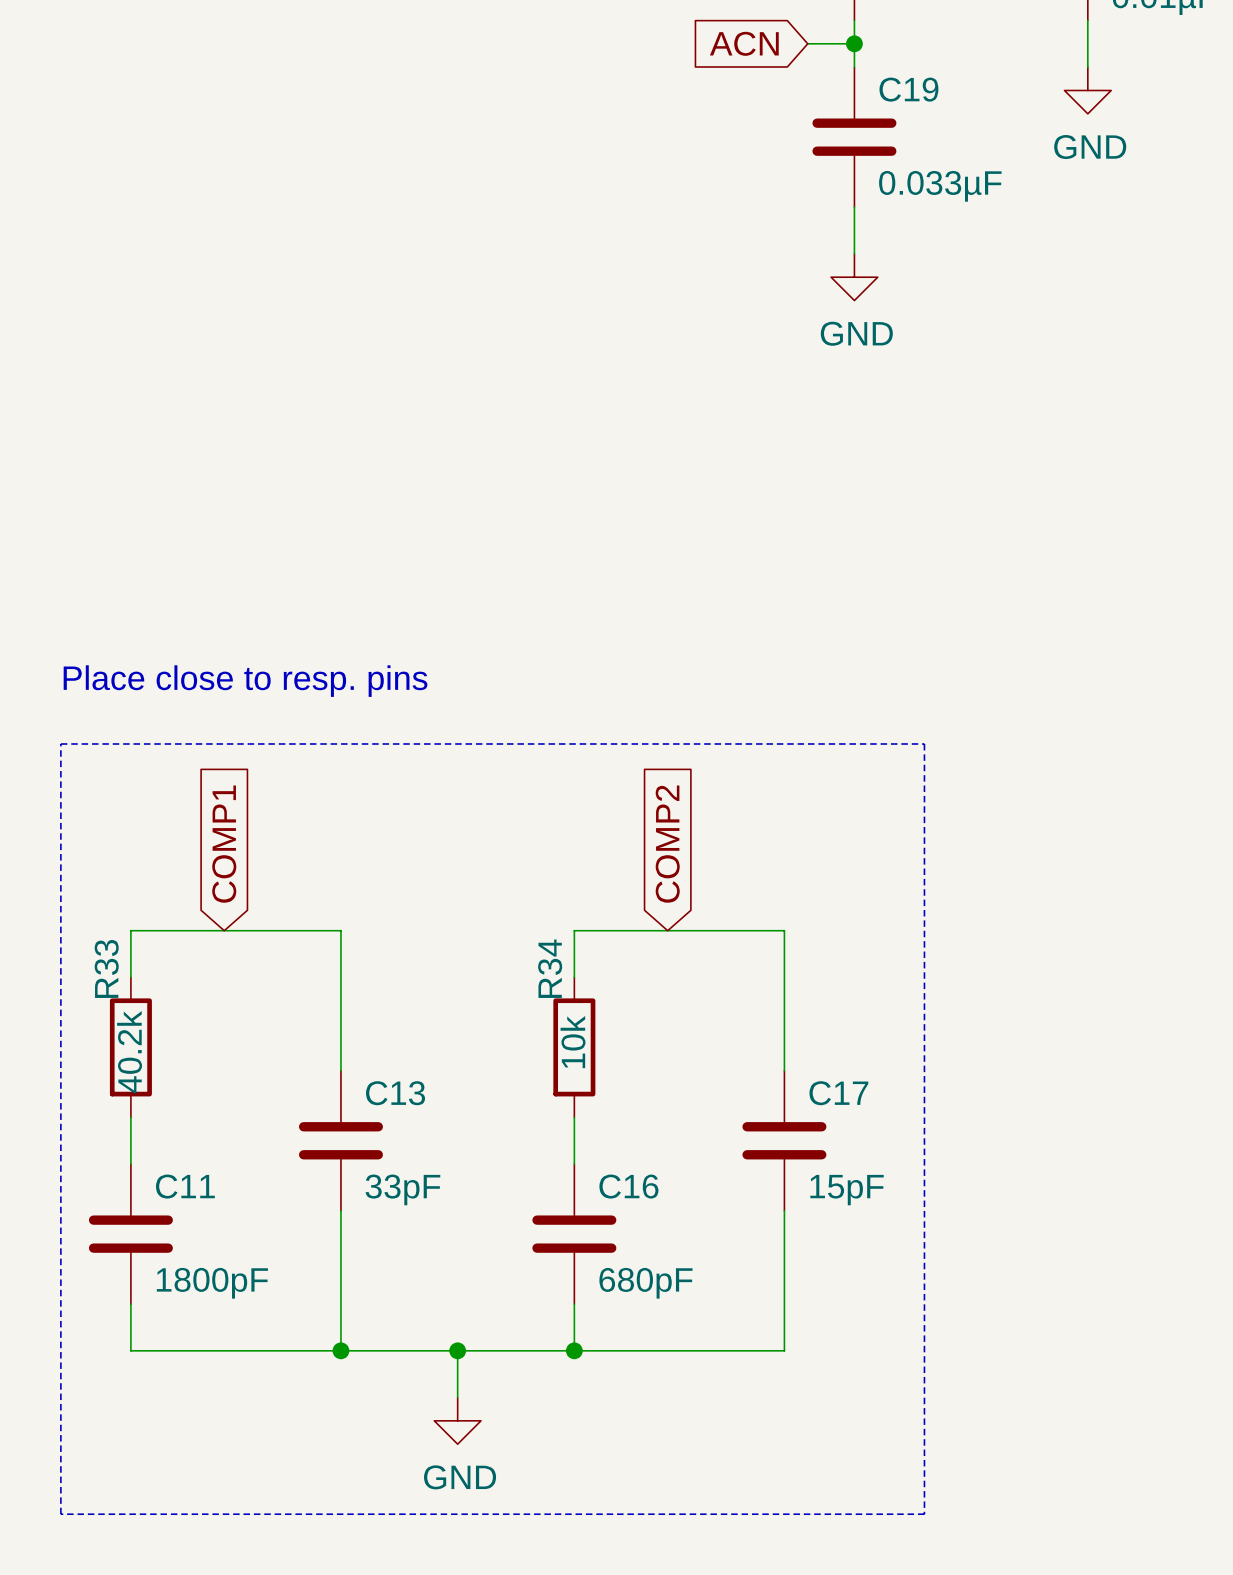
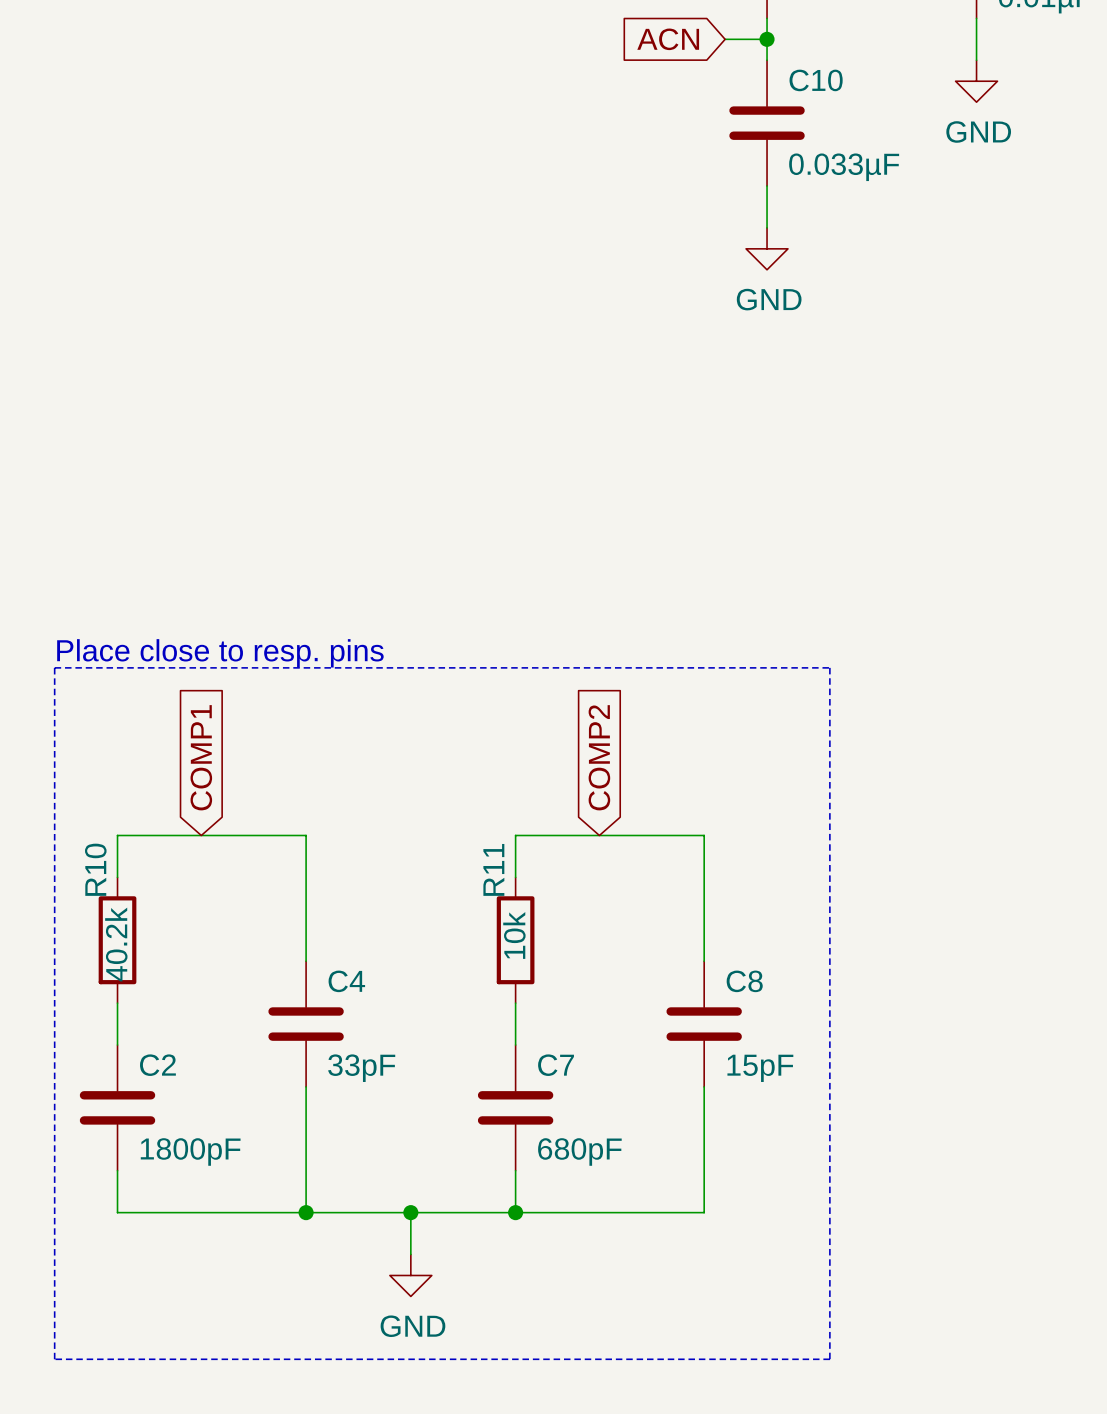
C19 name: C19 (908, 89) -> C10 (816, 80)
text position: Place close to resp. pins (245, 681) -> Place close to resp. pins (220, 653)
R33 name: R33 (106, 968) -> R10 (95, 869)
R34 name: R34 (550, 968) -> R11 (493, 869)
C13 name: C13 (395, 1093) -> C4 (346, 981)
C17 name: C17 (838, 1093) -> C8 (744, 981)
C11 name: C11 (185, 1186) -> C2 (157, 1065)
C16 name: C16 (628, 1186) -> C7 (556, 1065)

